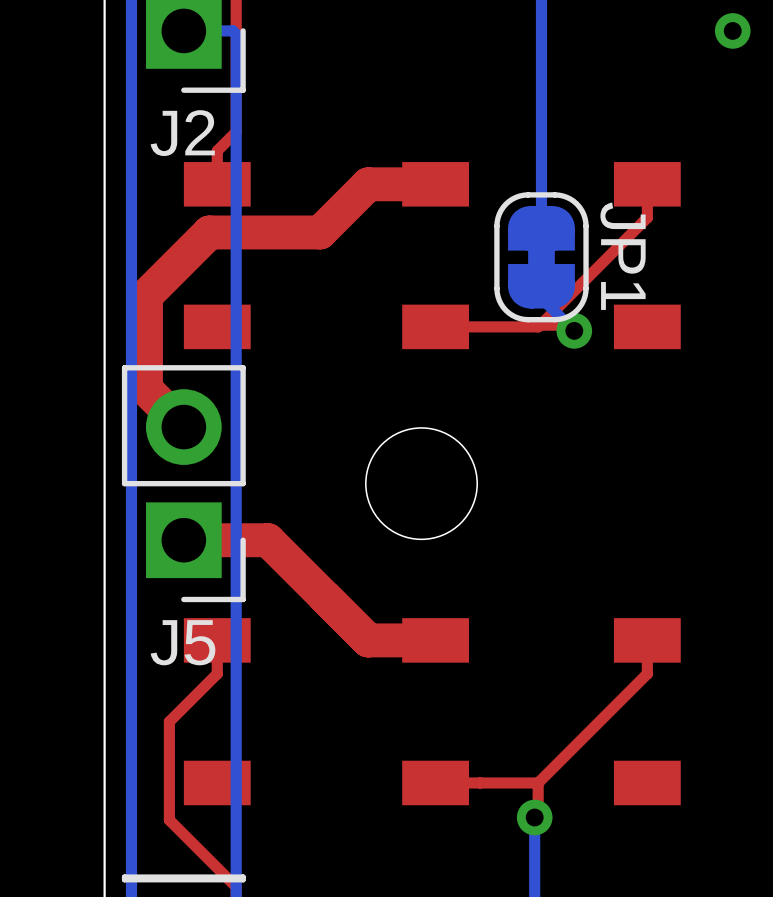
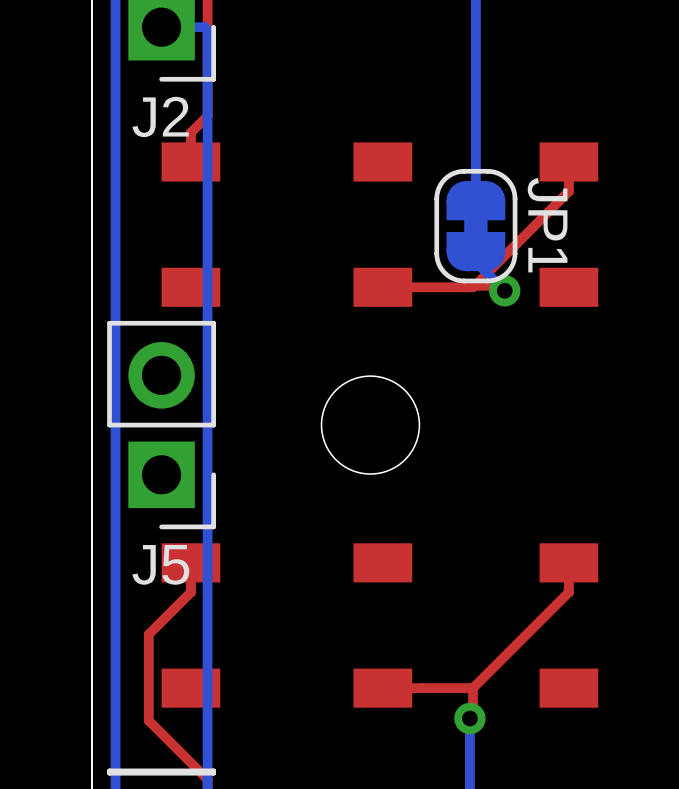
via: (732, 30) -> none
top track: (435, 184) (368, 184) (320, 232) (209, 232) (145, 295) (145, 389) (183, 427) -> none
top track: (183, 540) (268, 540) (368, 640) (435, 640) -> none

